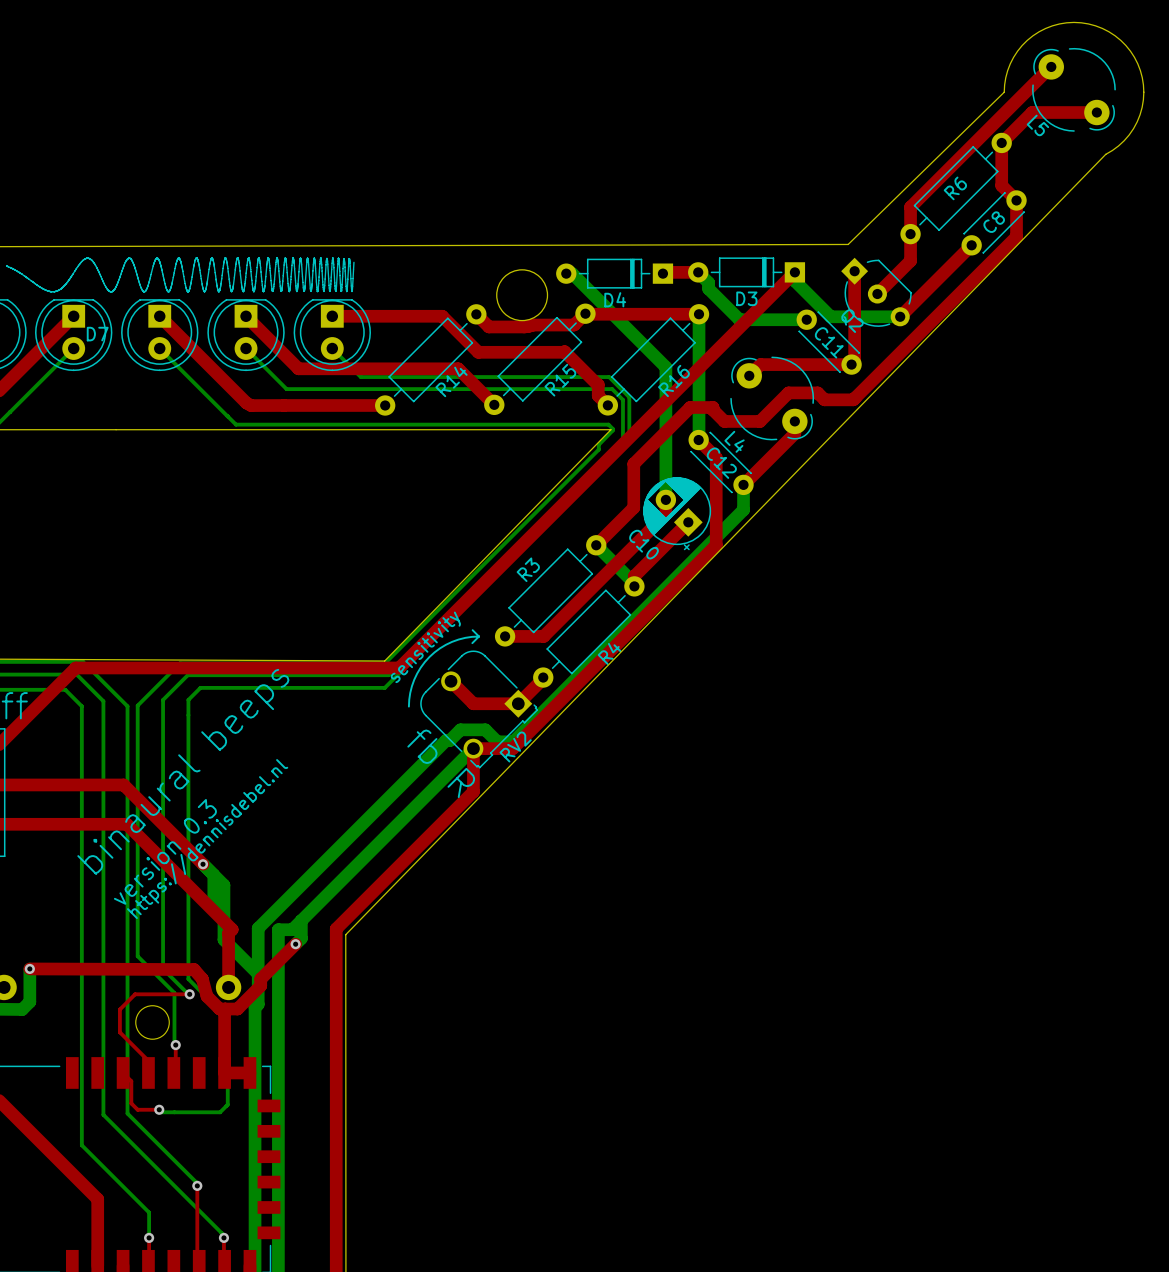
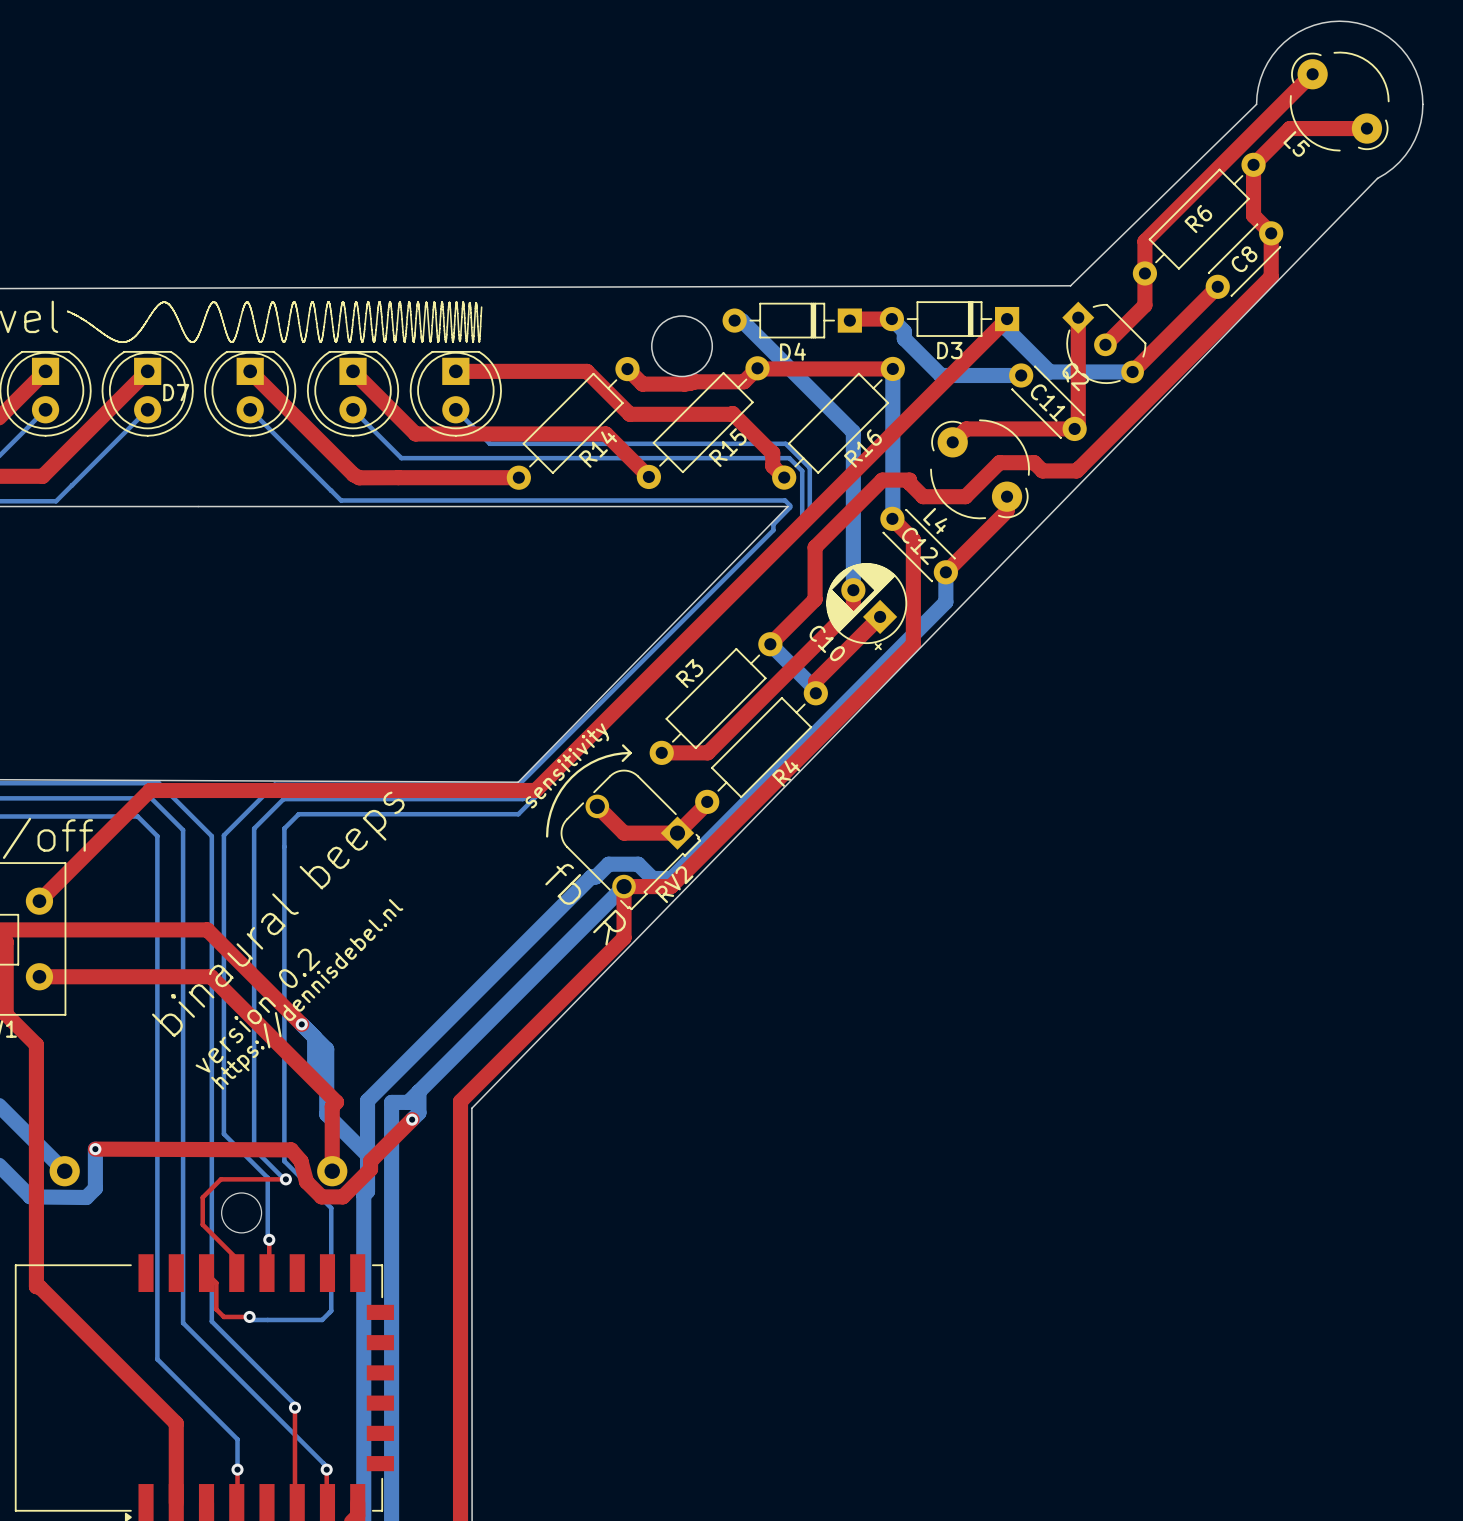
text: version 0.3 (165, 851) -> version 0.2 (257, 1010)
top track: (225, 1009) (224, 1072) (249, 1072) -> none

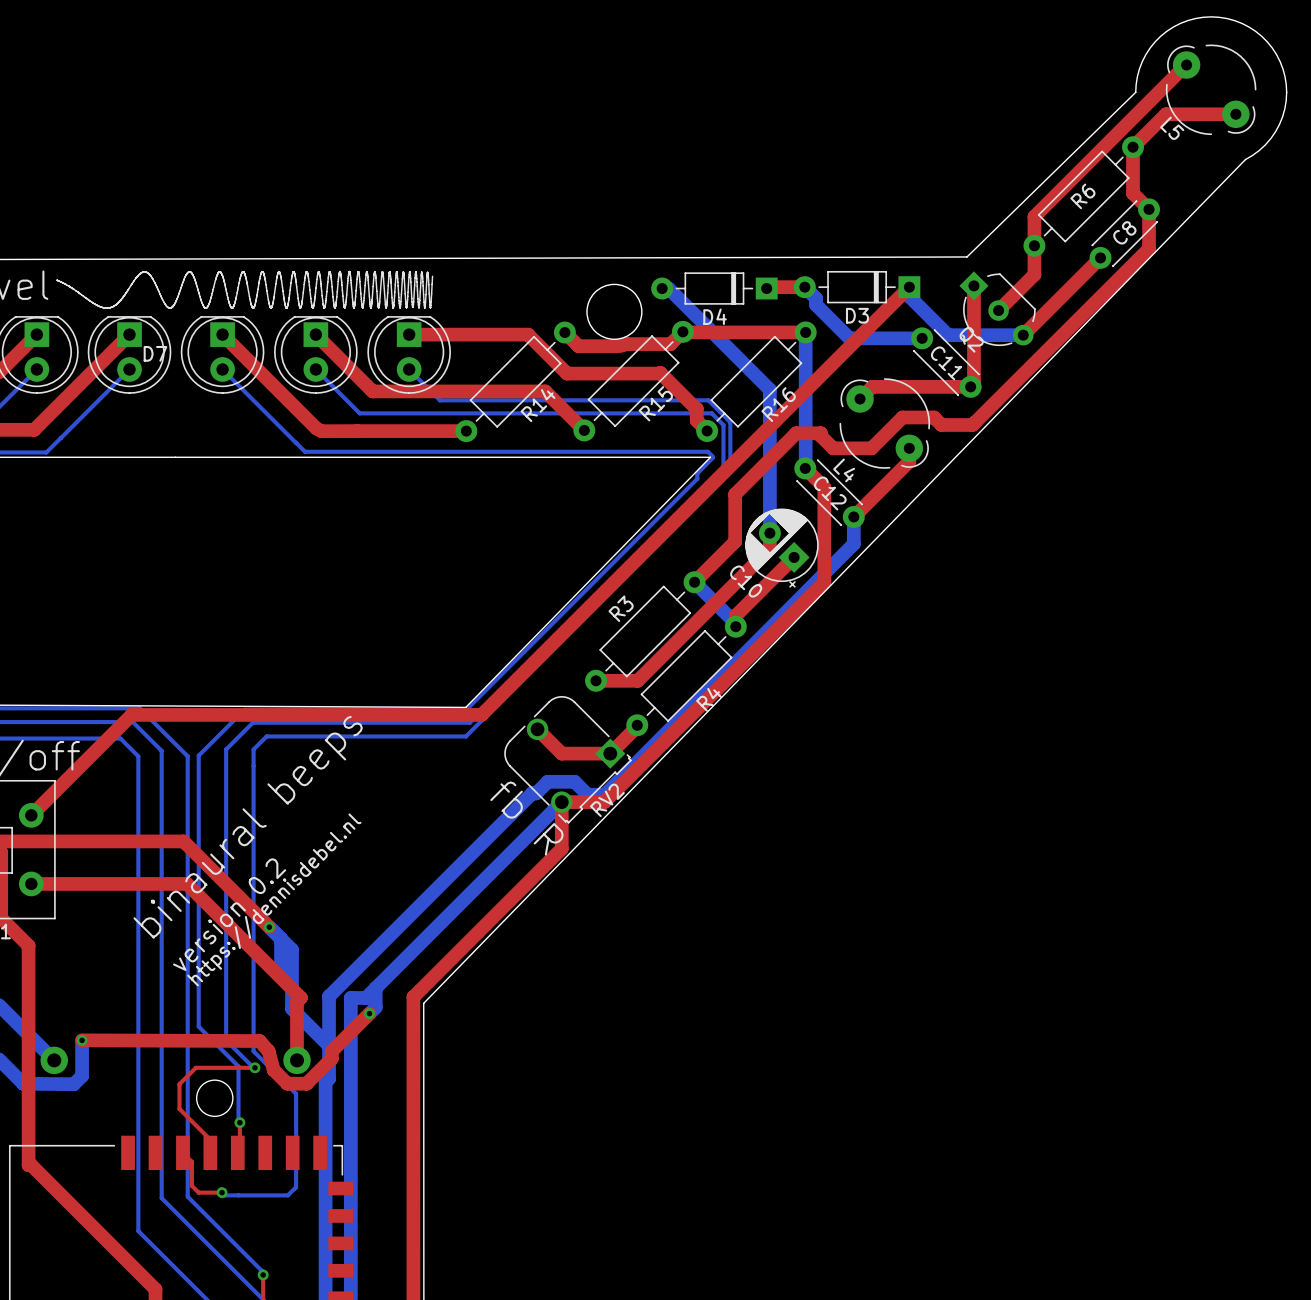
line: (623, 745) (630, 752) -> none
line: (630, 752) (622, 760) -> none
line: (630, 752) (614, 754) (598, 759) (584, 767) (571, 777) (561, 790) (553, 804) (548, 820) (547, 836) -> none
text: sensitivity (567, 765) -> none

